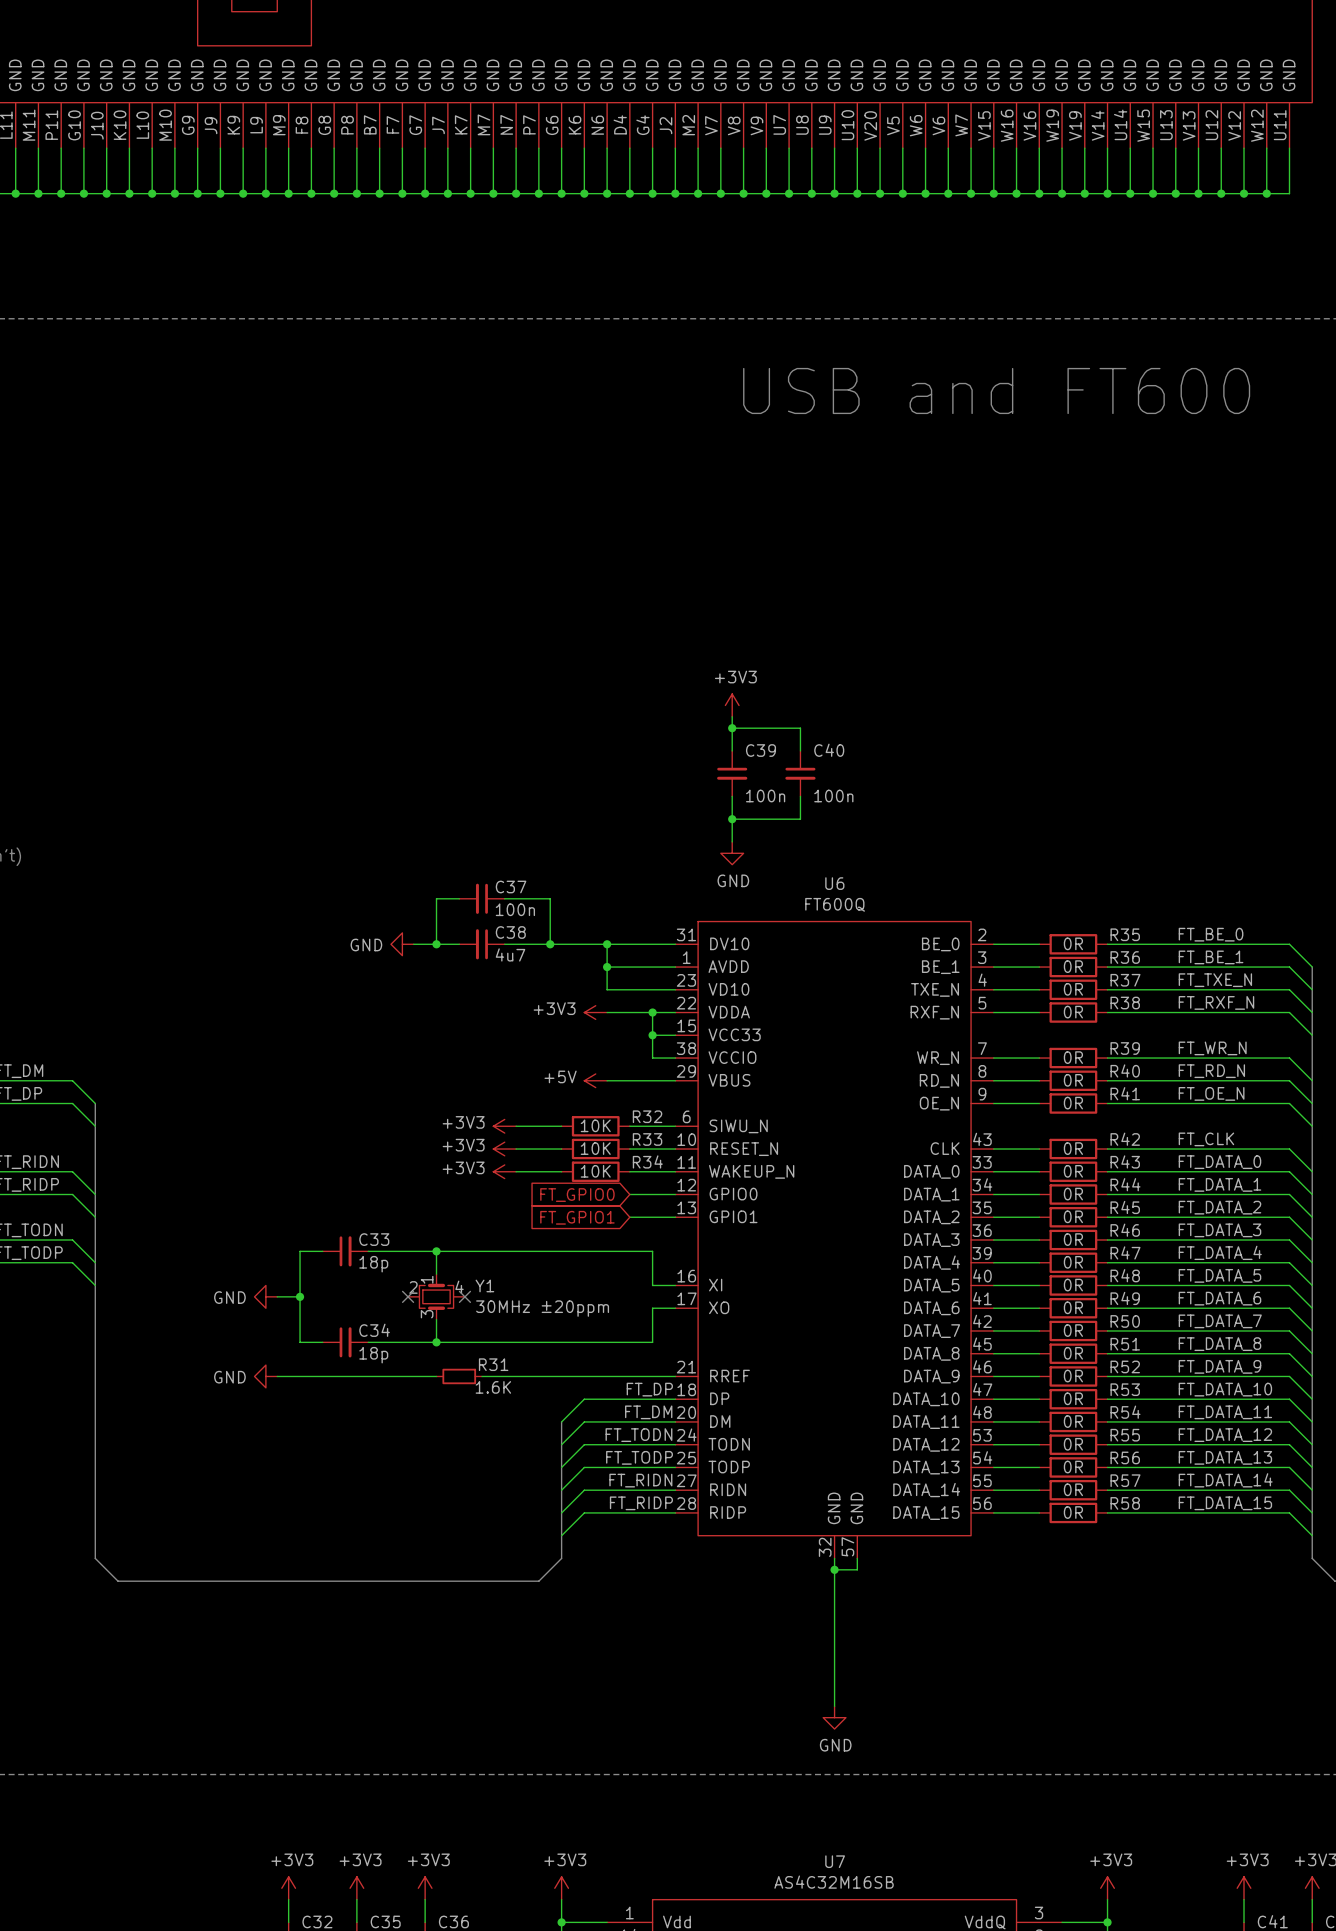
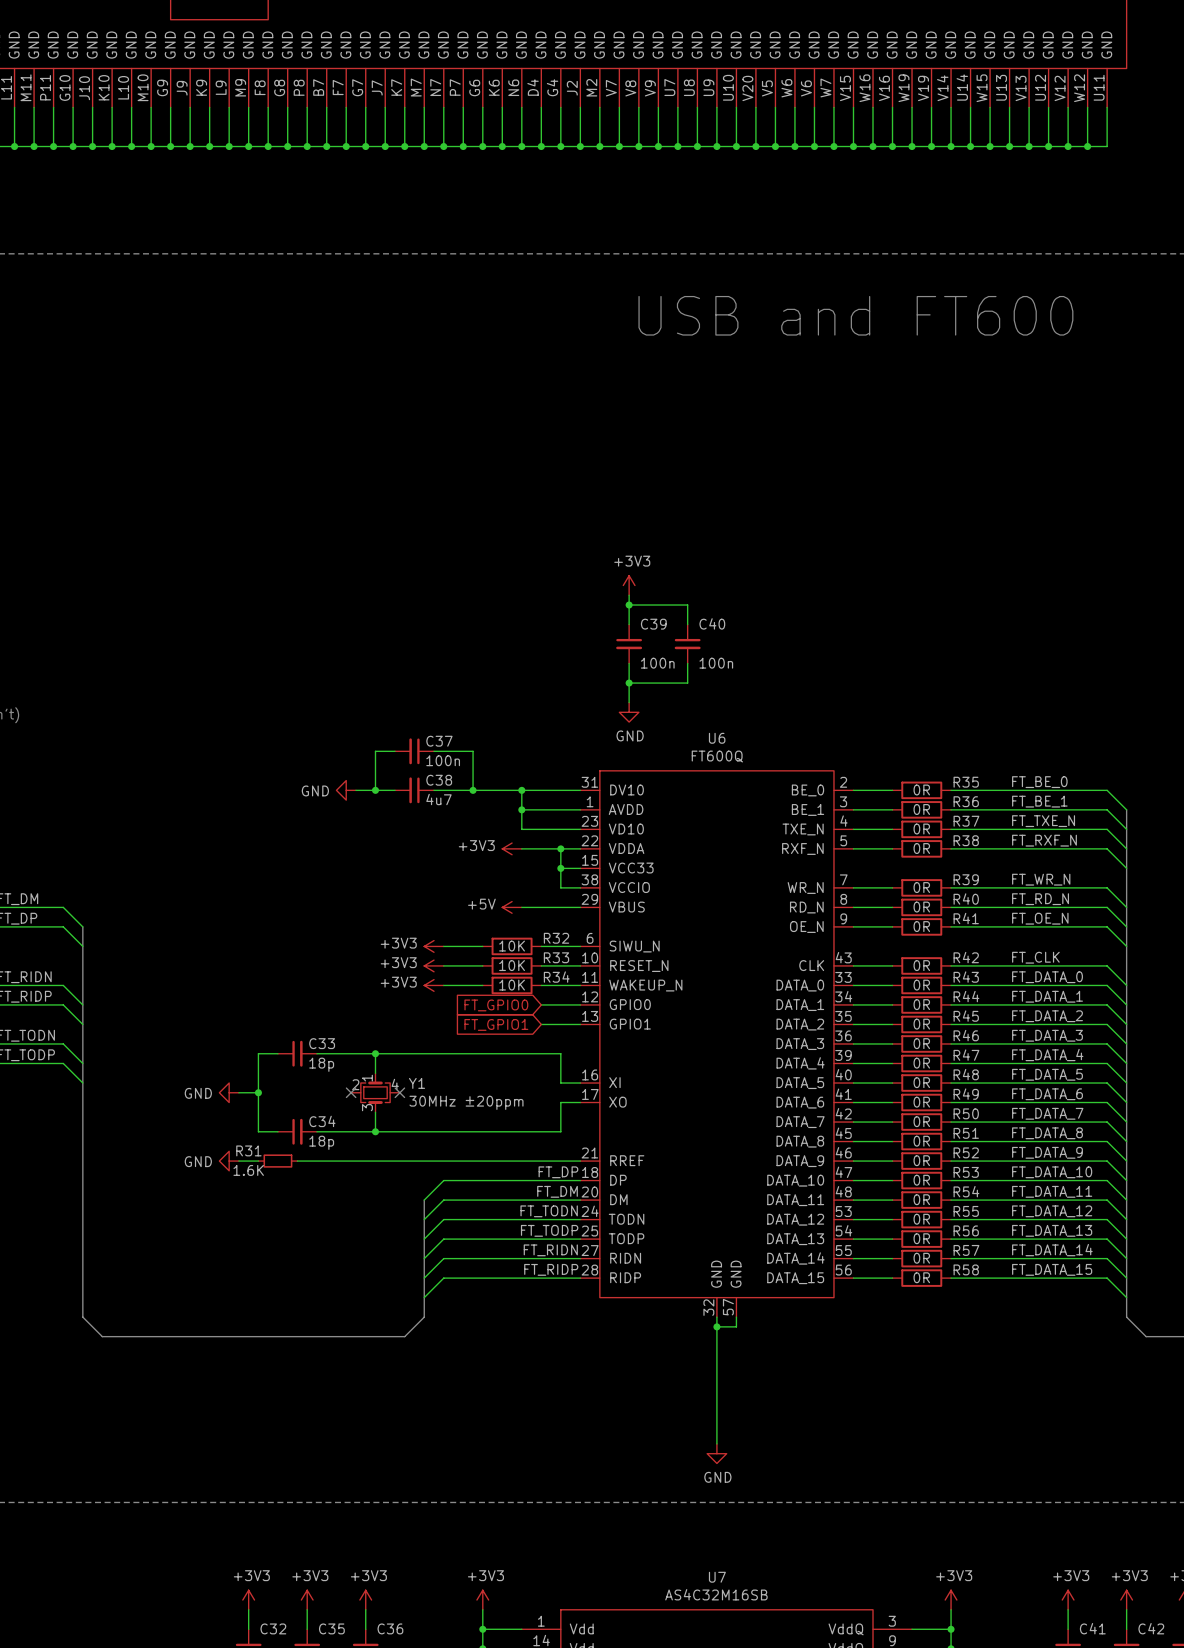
R31 name position: R31 (493, 1364) -> R31 (248, 1150)
wire: (300, 1376) (345, 1376) -> (375, 1161) (414, 1161)
R31 position: (459, 1376) -> (277, 1161)
R31 value position: 1.6K (493, 1387) -> 1.6K (248, 1170)
wire: (584, 1399) (561, 1421) -> (502, 1180) (443, 1180) (424, 1200)
bus: (561, 1421) (561, 1558) (538, 1581) (470, 1581) -> (424, 1200) (424, 1317) (404, 1336)
wire: (584, 1421) (561, 1444) -> (502, 1200) (443, 1200) (424, 1219)
wire: (584, 1444) (561, 1467) -> (502, 1219) (443, 1219) (424, 1239)
wire: (584, 1467) (561, 1490) -> (502, 1239) (443, 1239) (424, 1258)
wire: (584, 1490) (561, 1512) -> (502, 1258) (443, 1258) (424, 1278)
wire: (584, 1512) (561, 1535) -> (502, 1278) (443, 1278) (424, 1297)

